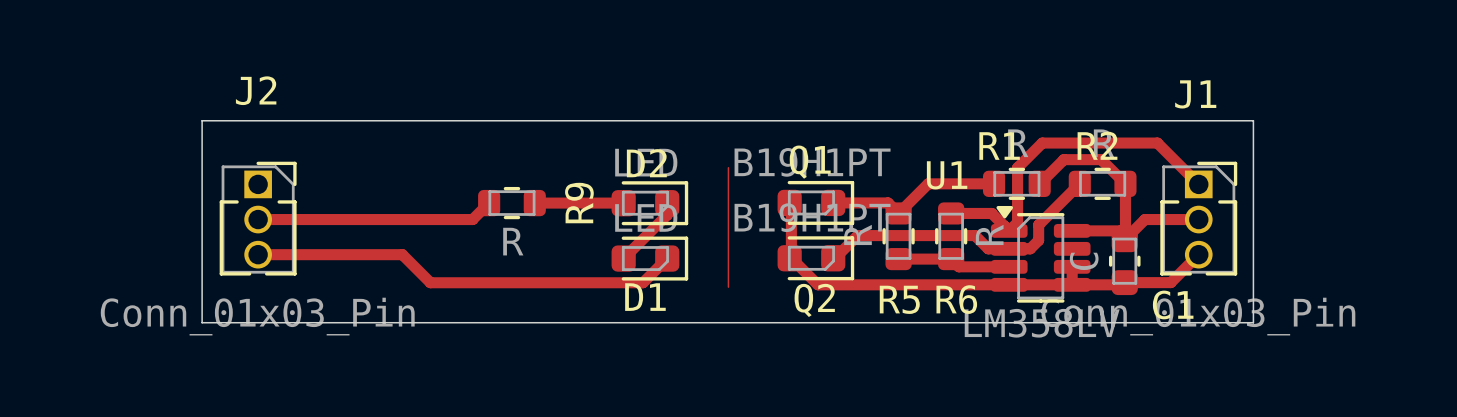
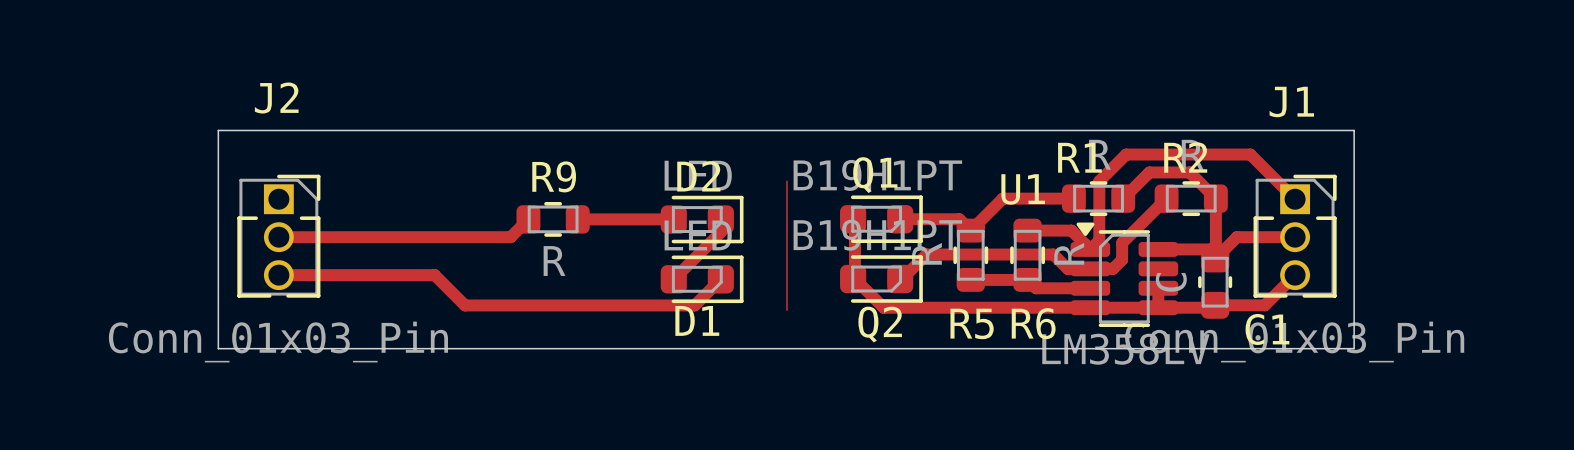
R9 name rotation: 0° (579, 203) -> 90° clockwise (554, 176)
R9 name position: R9 (579, 203) -> R9 (554, 176)

